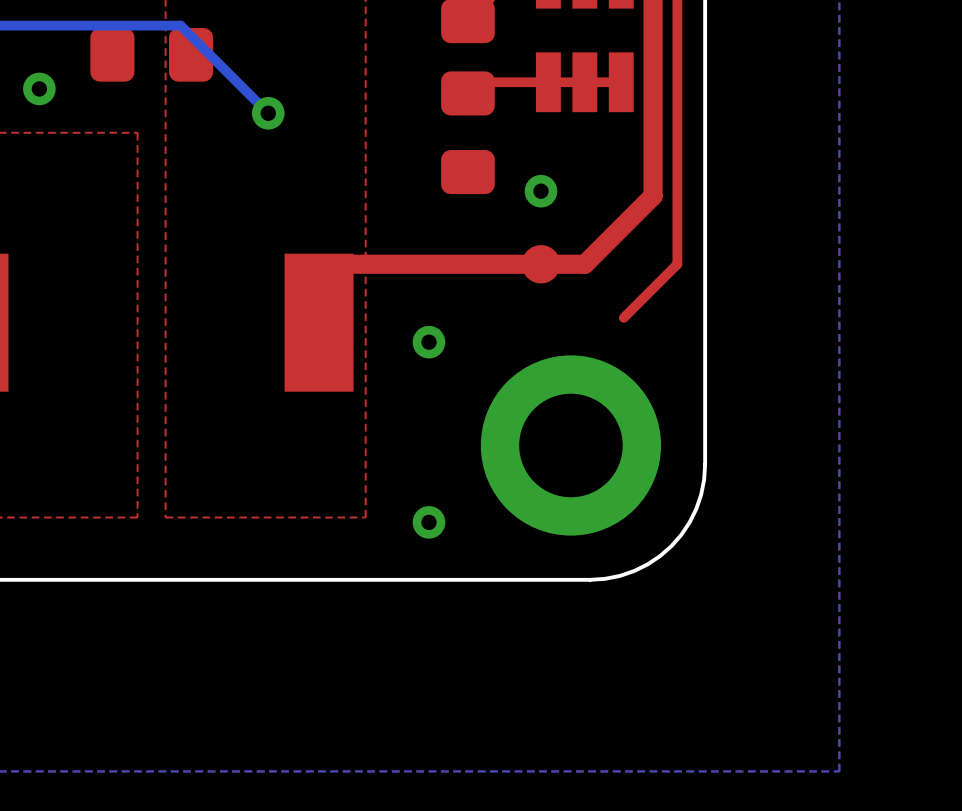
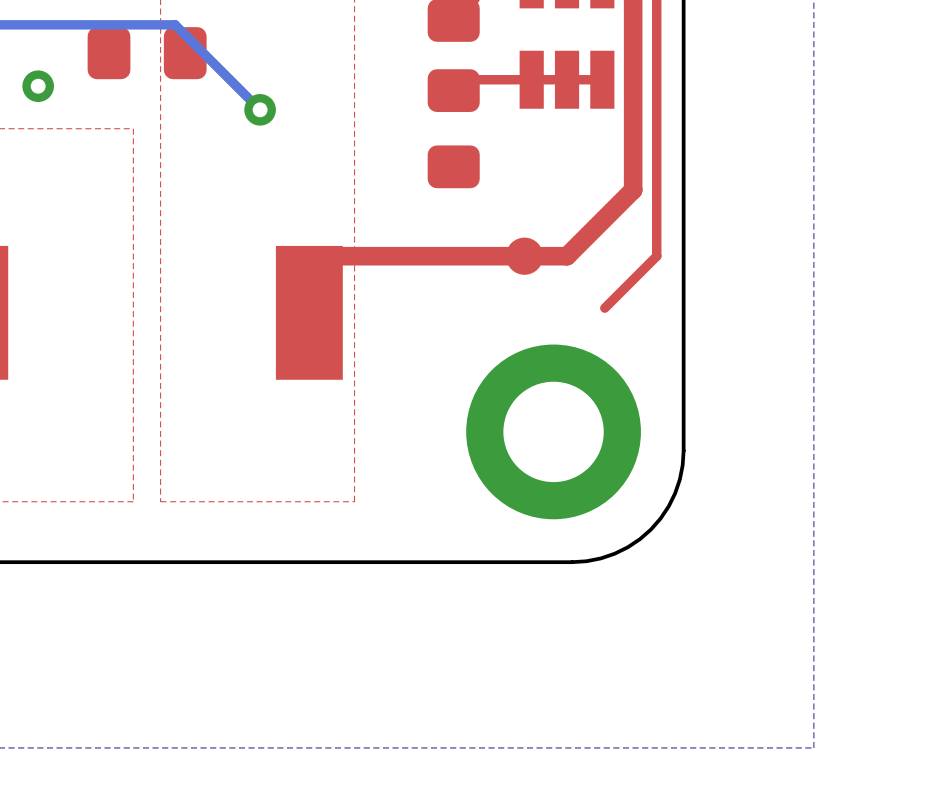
via: (541, 191) -> none
via: (428, 342) -> none
via: (428, 522) -> none

